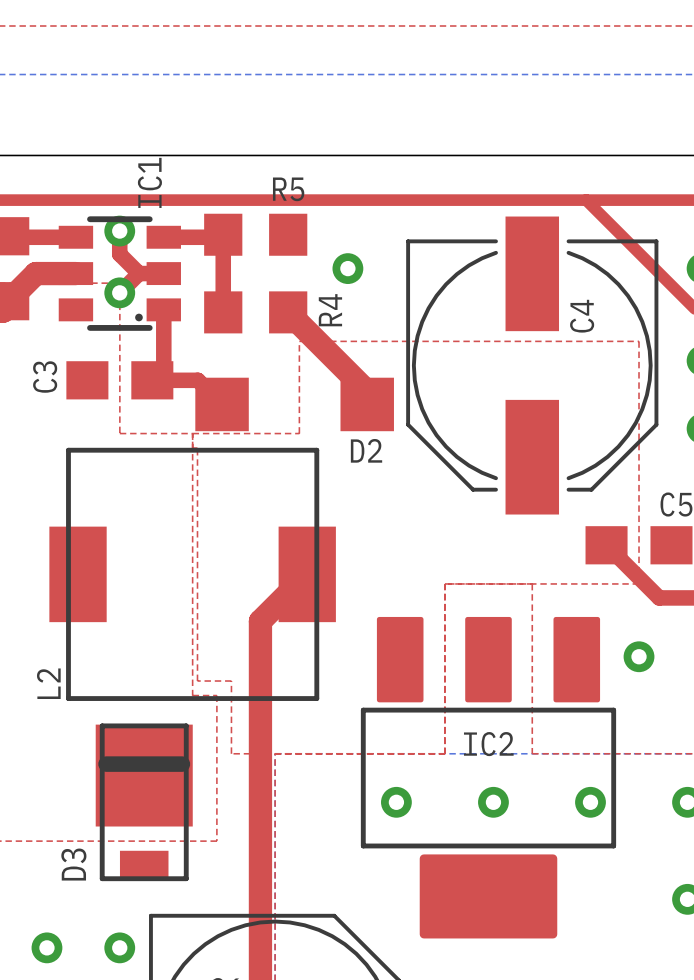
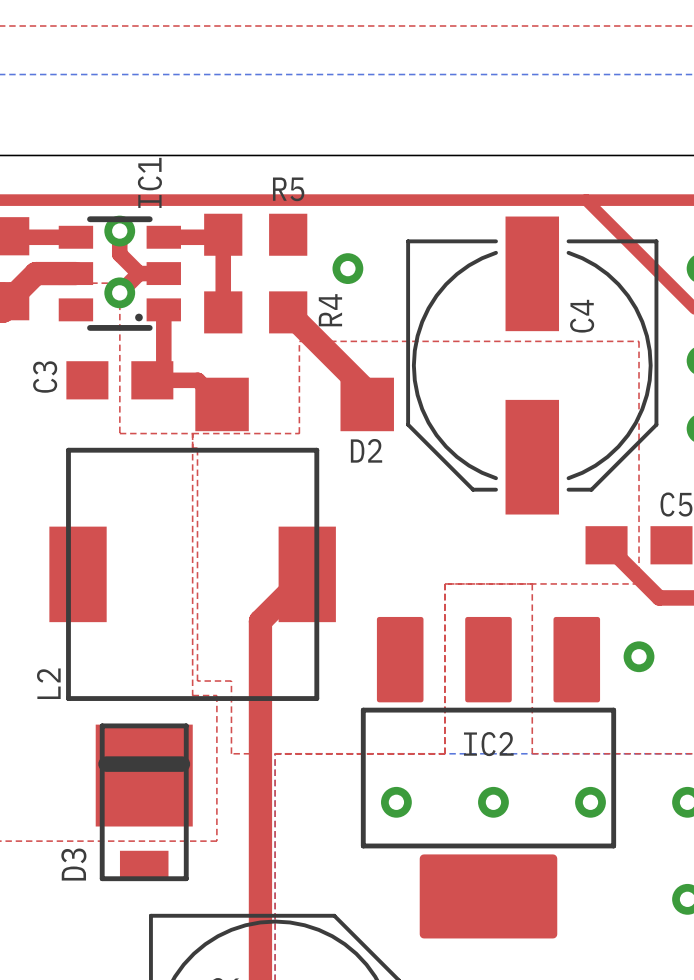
via: (46, 947) -> none
via: (119, 947) -> none

